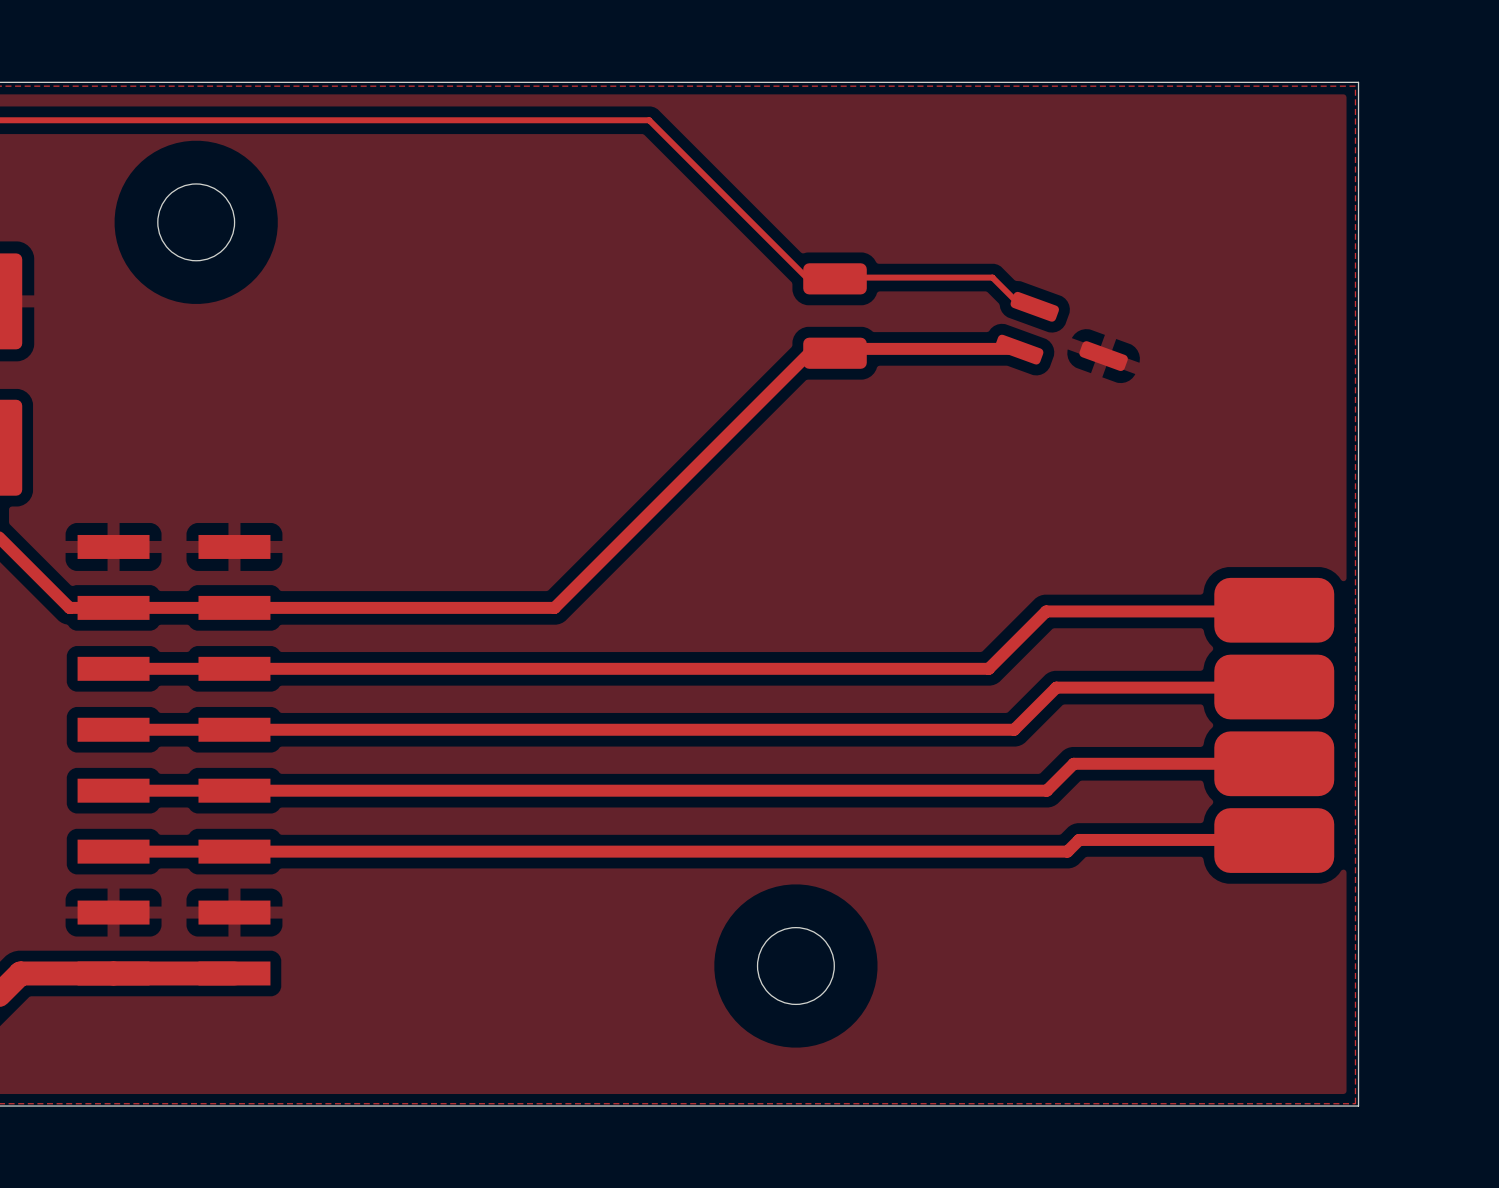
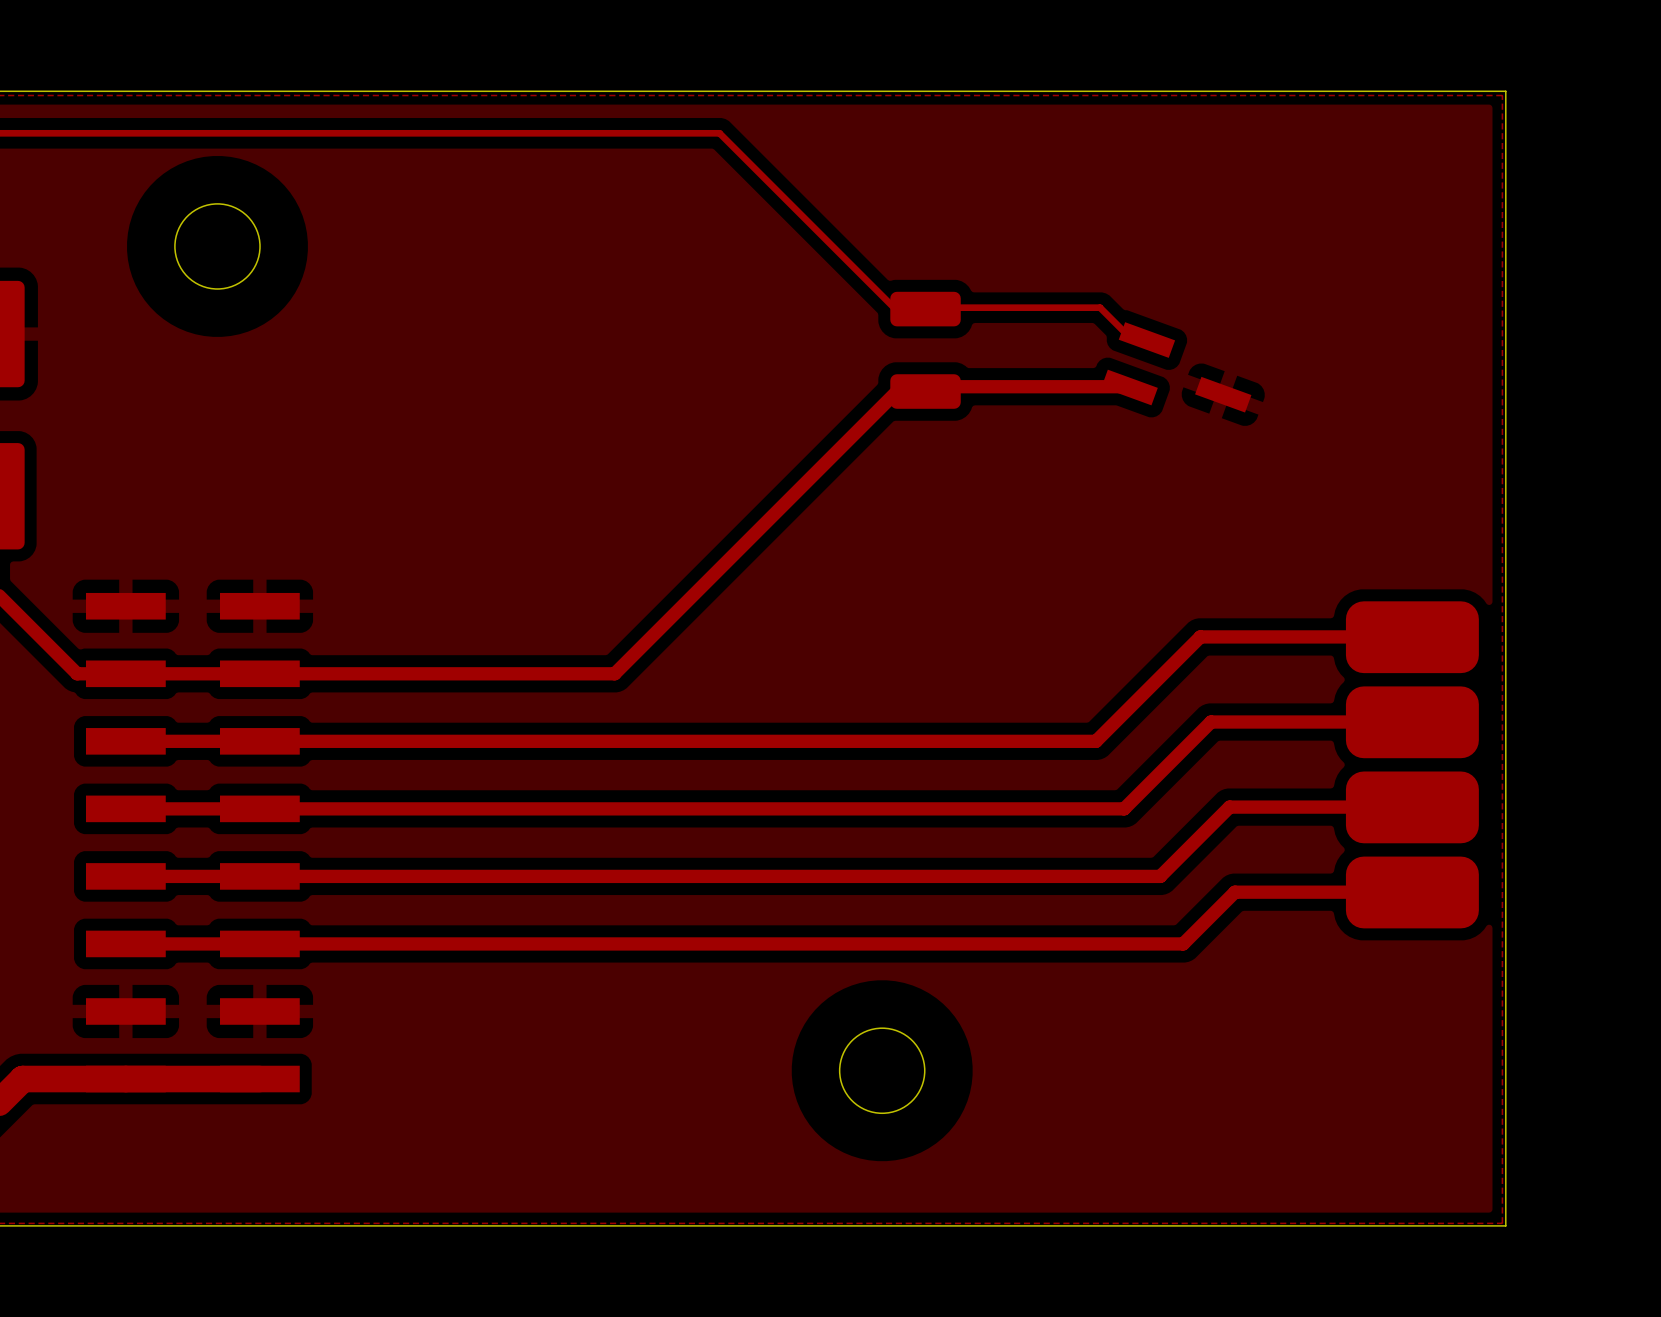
part footprint: [994, 291, 1128, 372] -> [1101, 322, 1252, 413]
top track: (1237, 611) (1046, 611) -> (1412, 636) (1200, 636) (1159, 677)
top track: (1237, 687) (1056, 687) -> (1412, 722) (1211, 722) (1170, 762)
part position: (1274, 725) -> (1412, 764)
top track: (1238, 763) (1073, 763) -> (1412, 807) (1229, 807) (1190, 846)
top track: (1238, 839) (1079, 839) -> (1412, 892) (1234, 892) (1196, 931)

